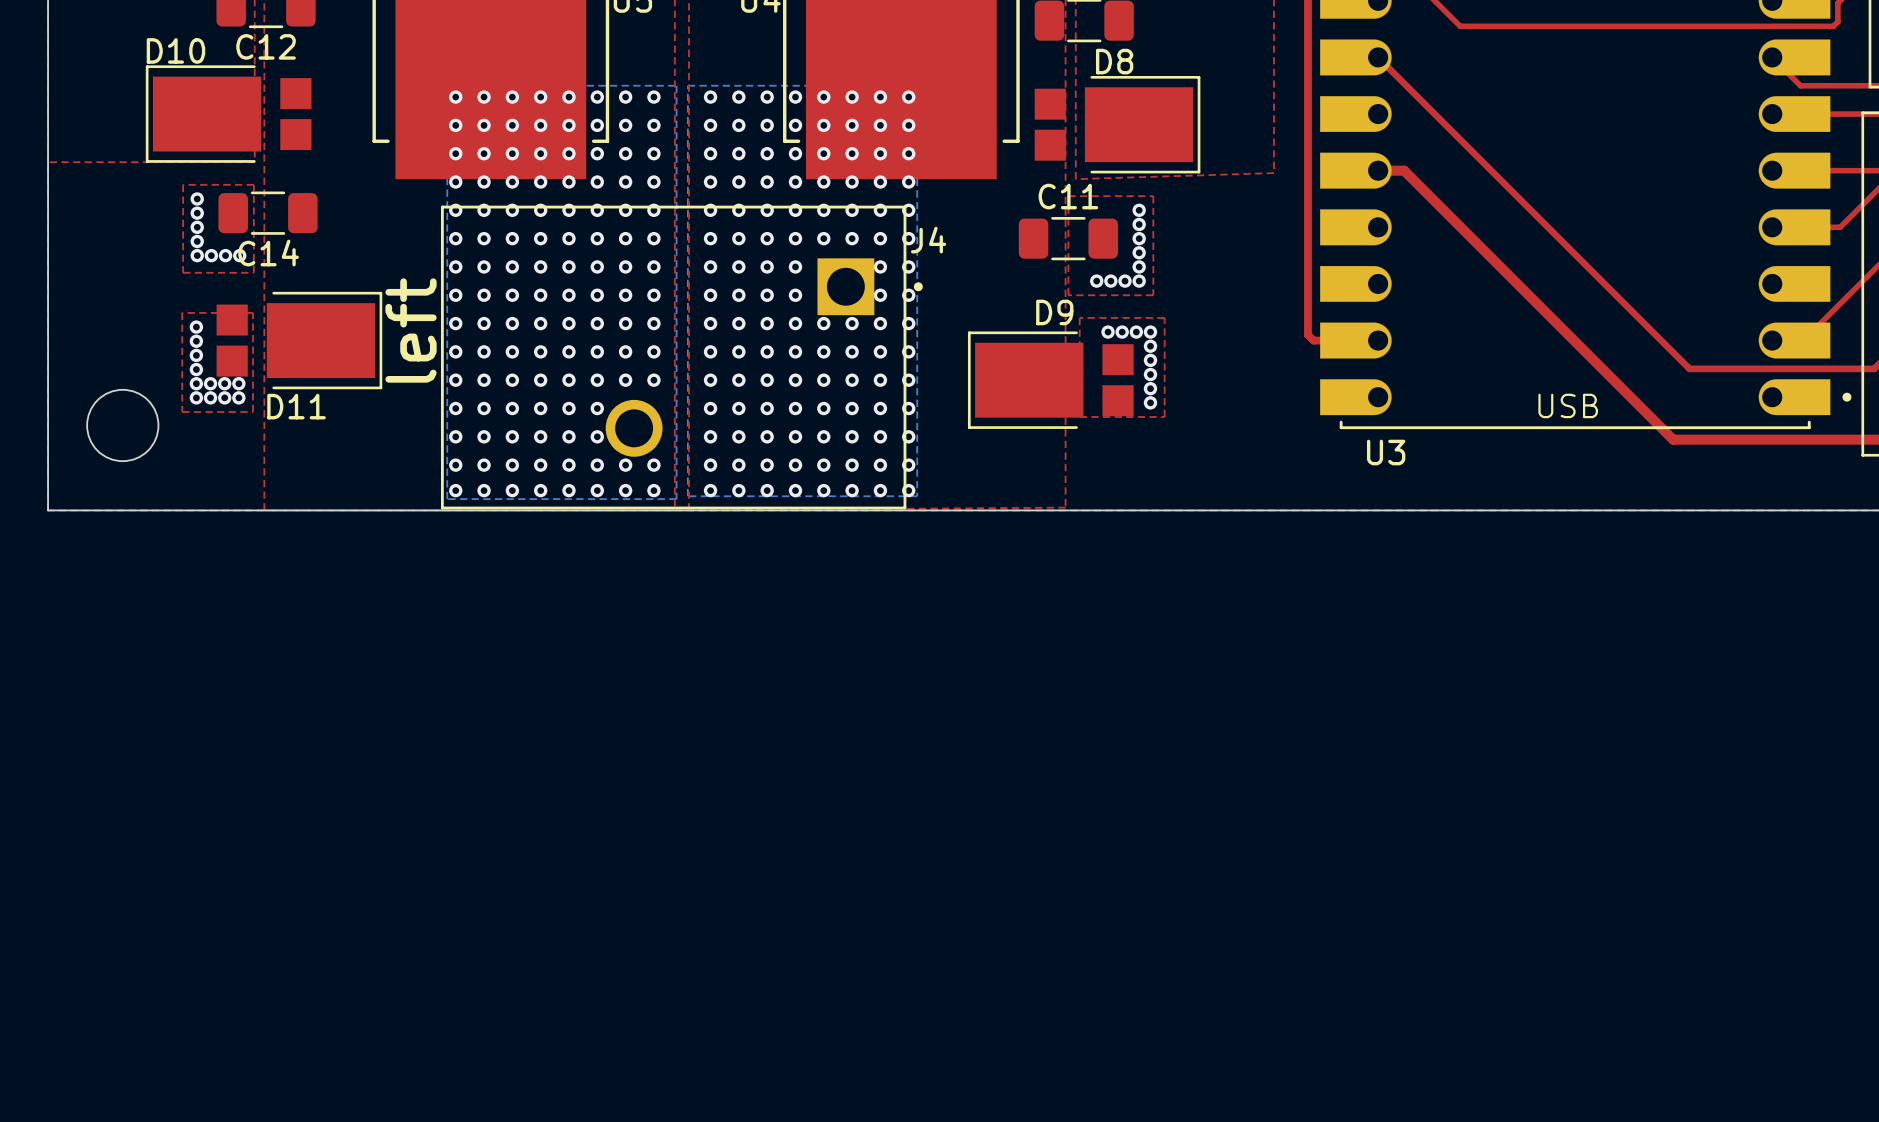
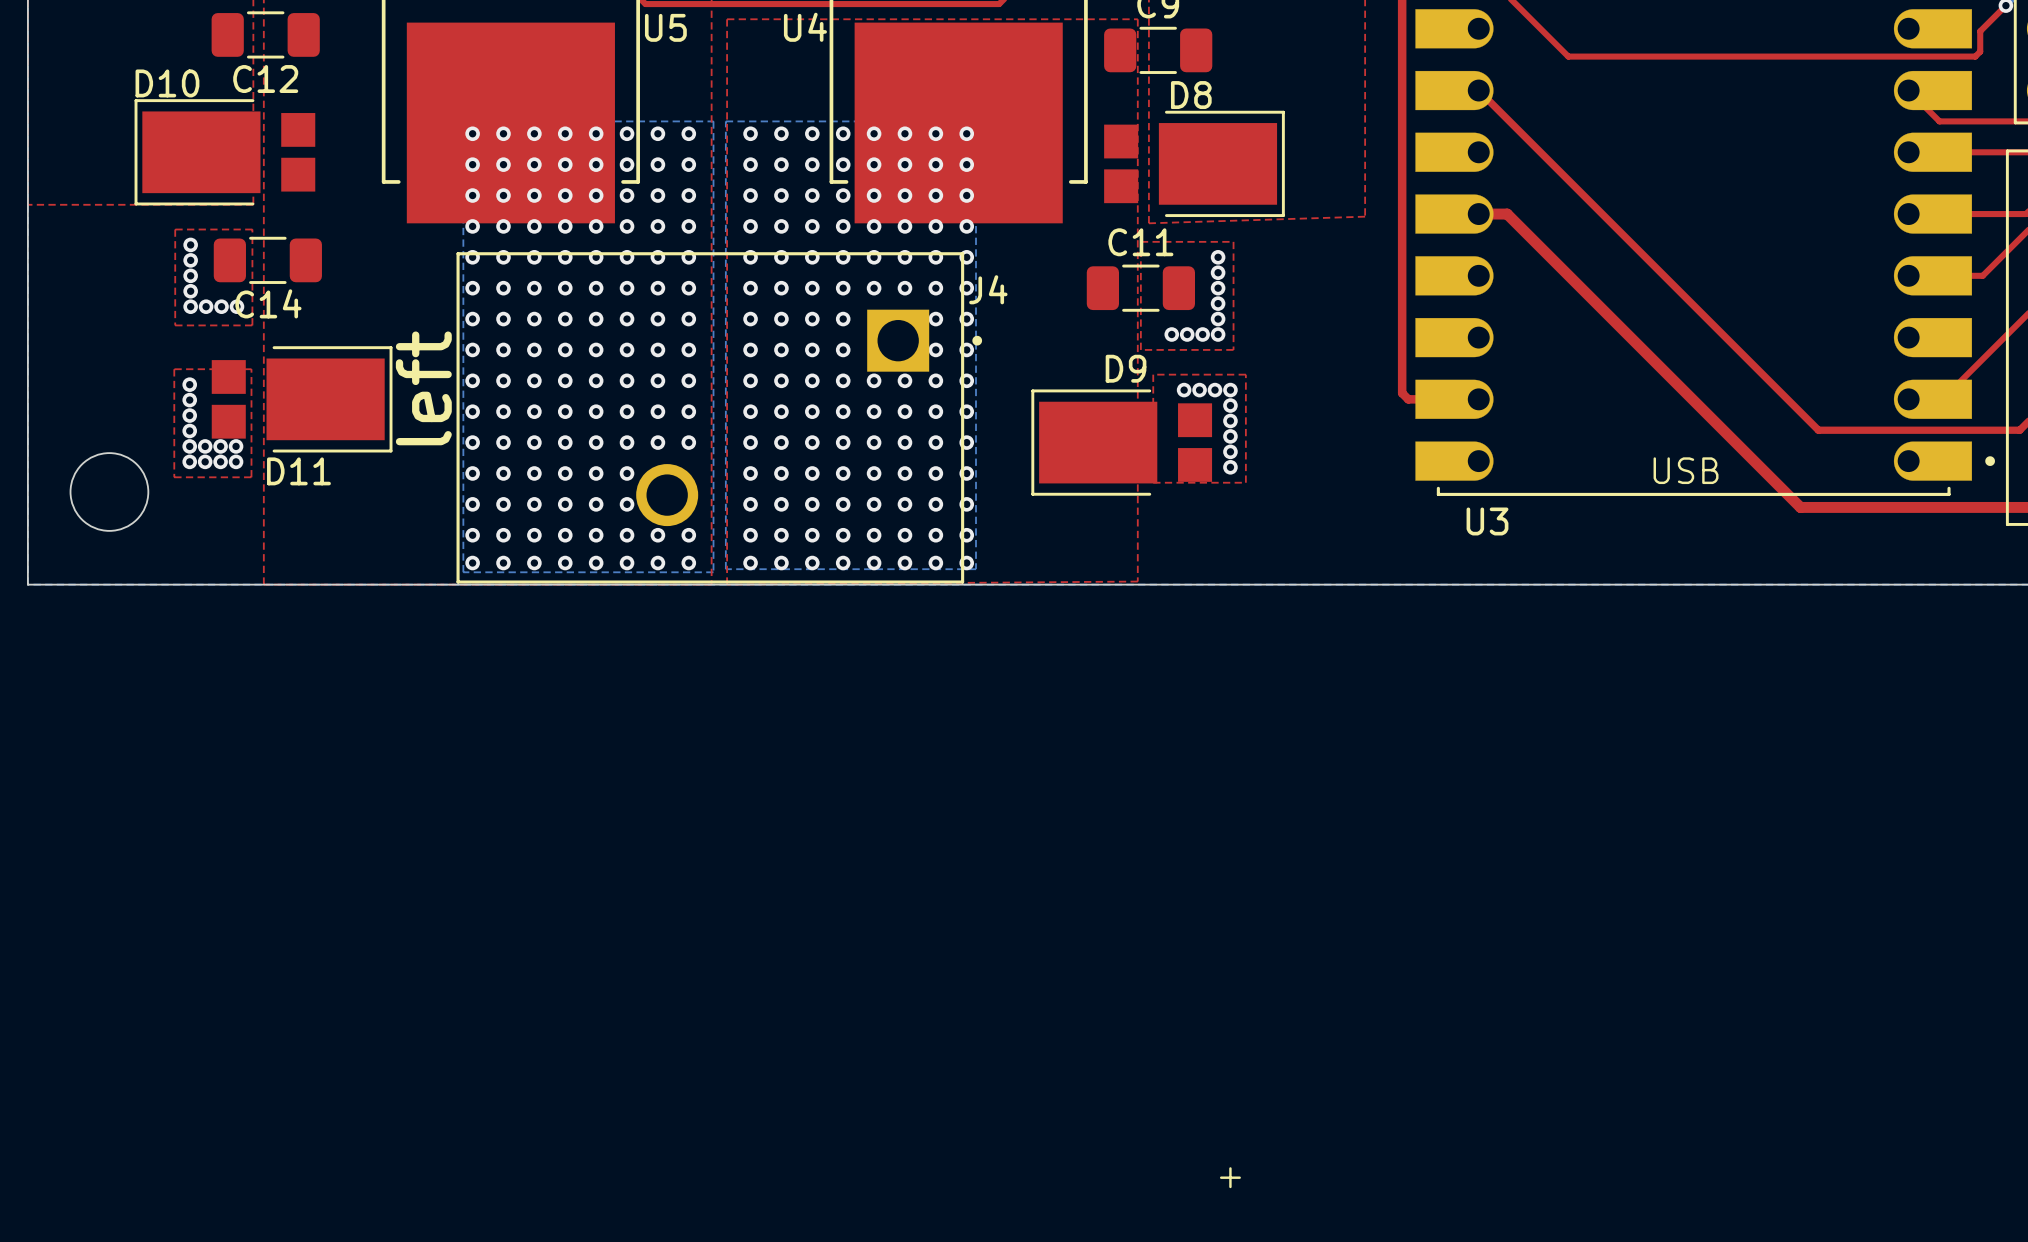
text: none -> + (1230, 1177)

